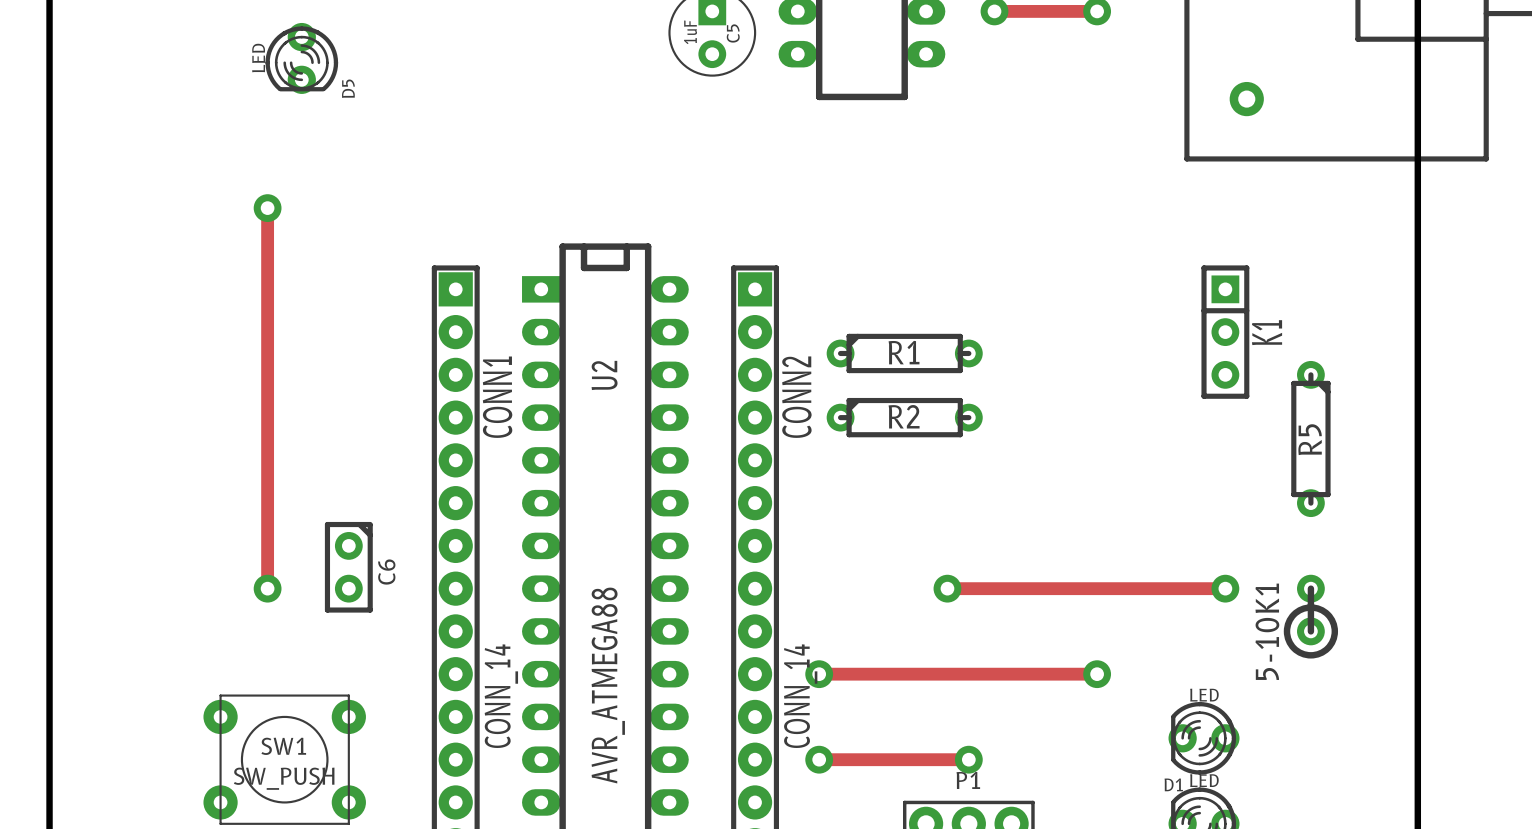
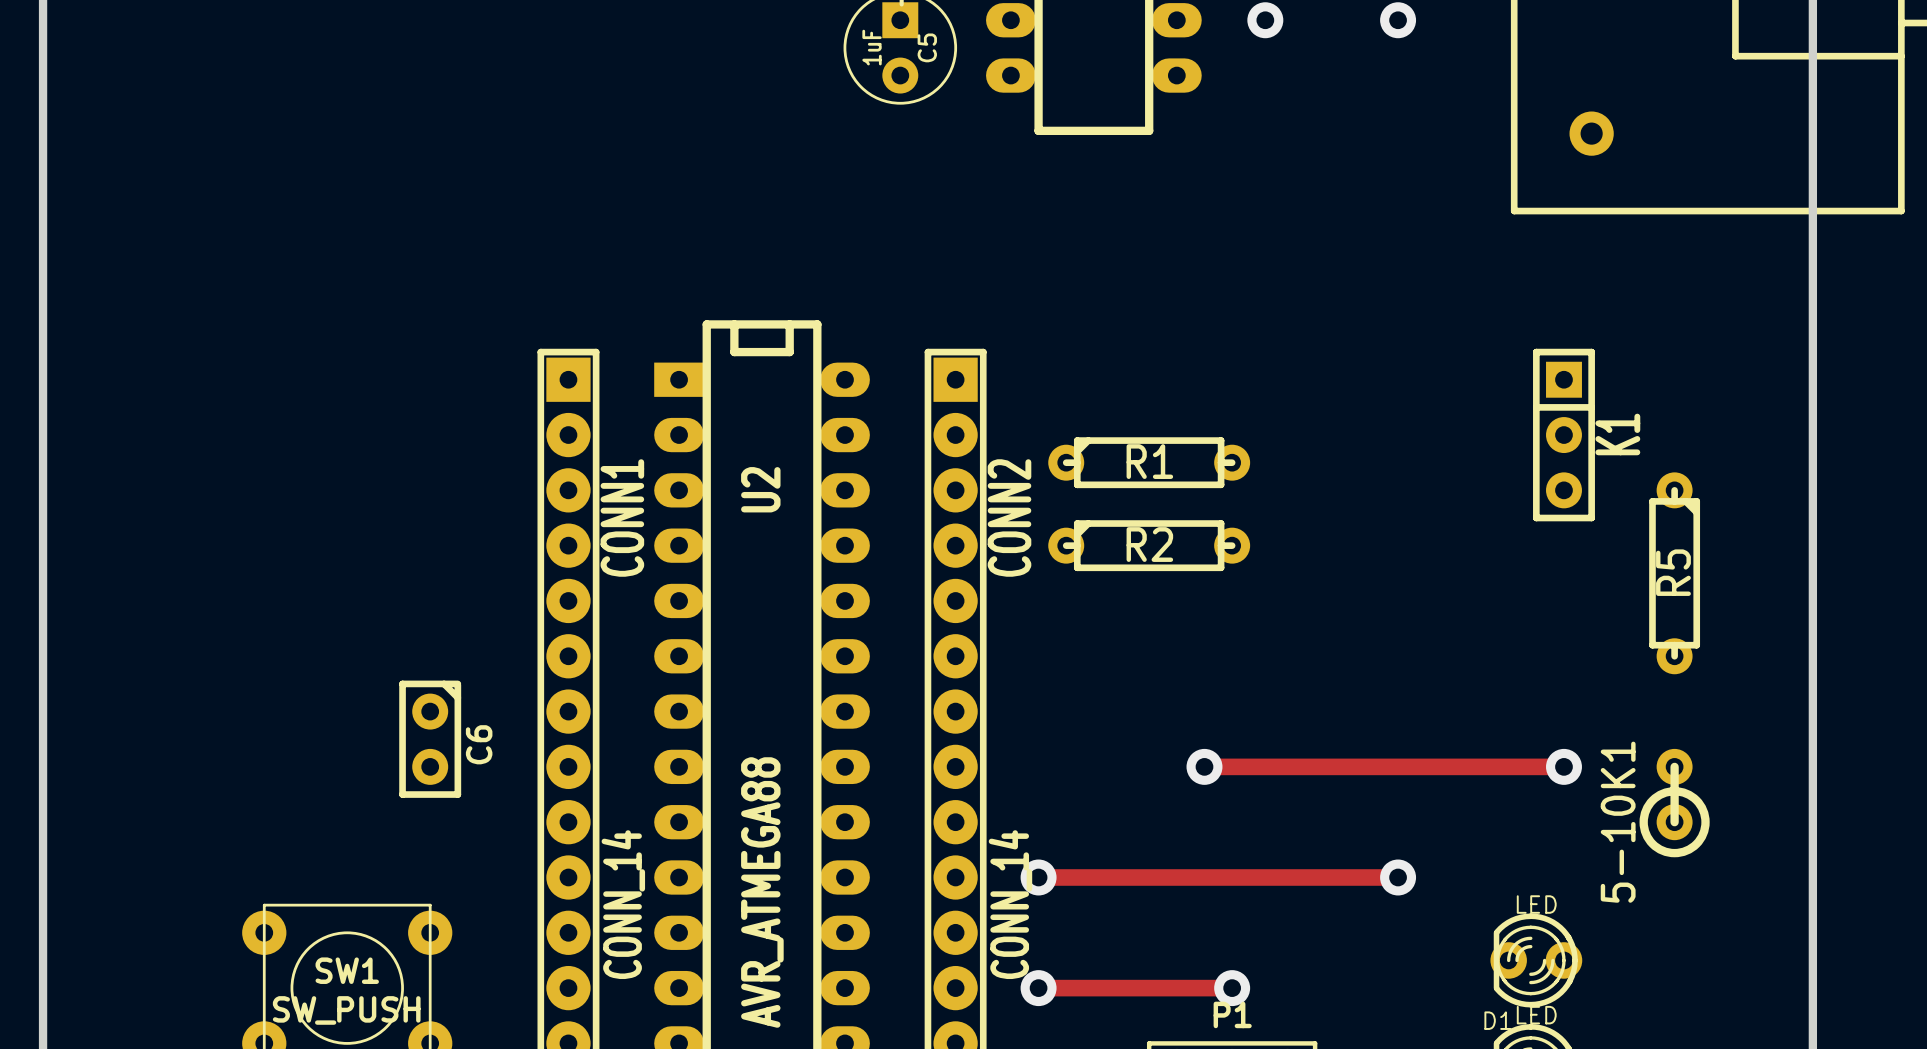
track: (994, 11) (1097, 11) -> none
D5: LED (301, 58) -> none
track: (267, 208) (267, 588) -> none
via: (267, 208) -> none
via: (267, 588) -> none

